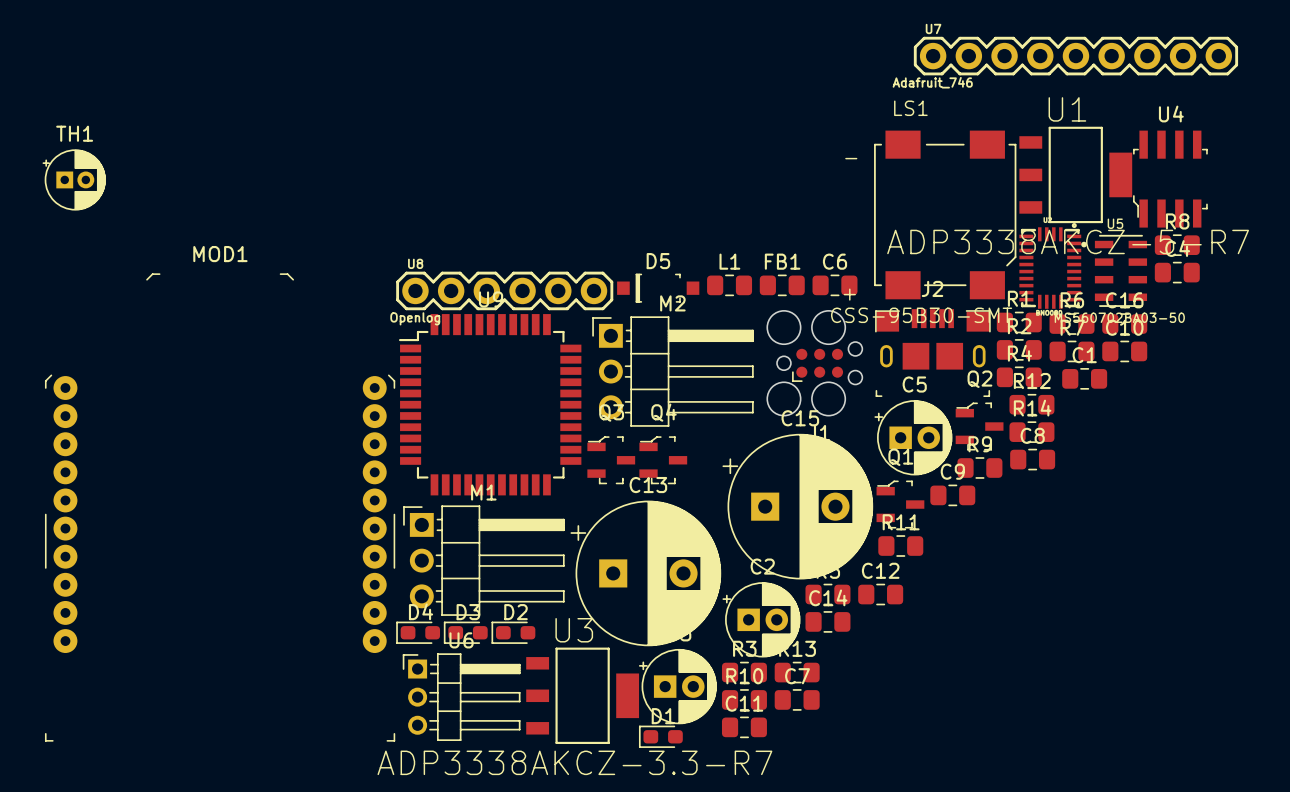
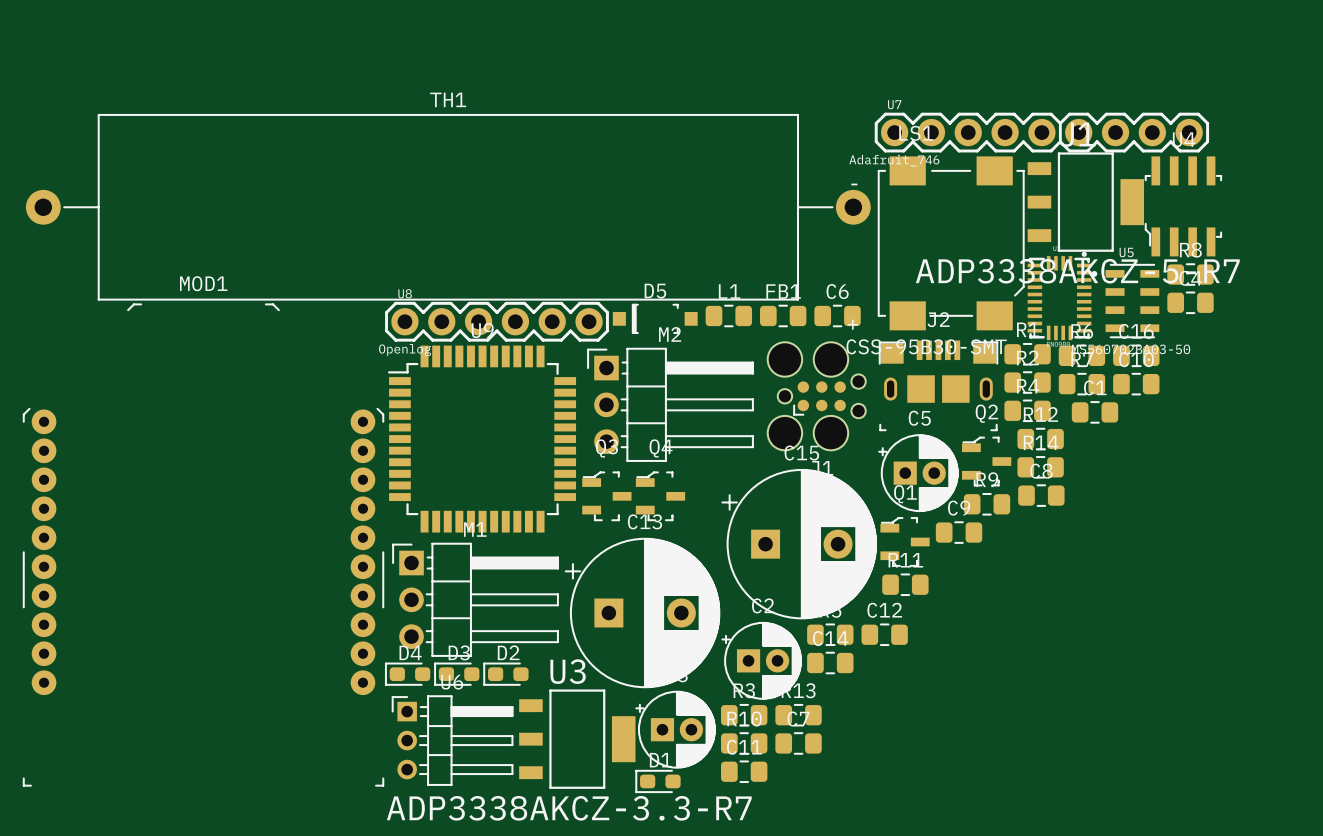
U7 position: (1075, 56) -> (1041, 132)
TH1 name position: TH1 (74, 133) -> TH1 (448, 99)
TH1 footprint: [42, 149, 106, 211] -> [25, 114, 871, 301]

